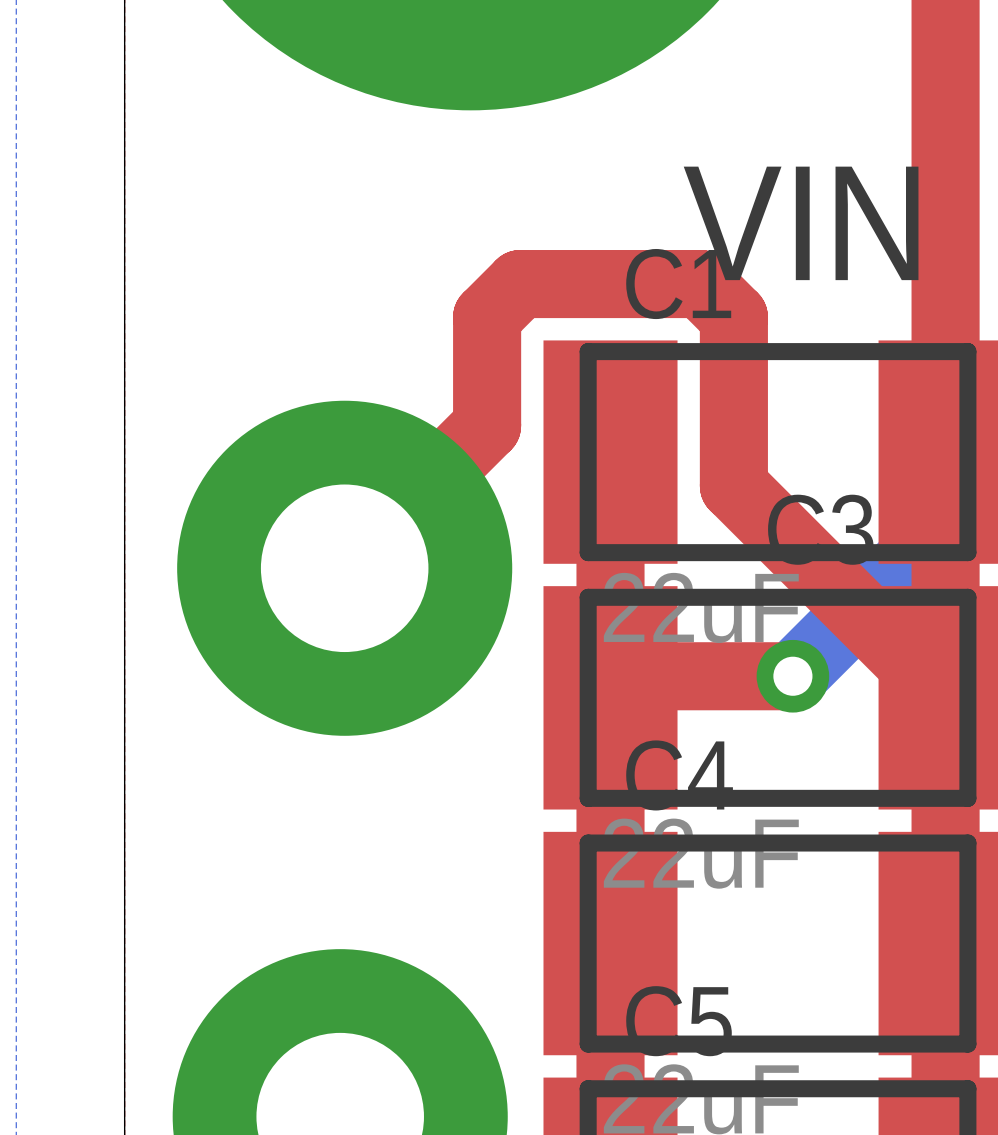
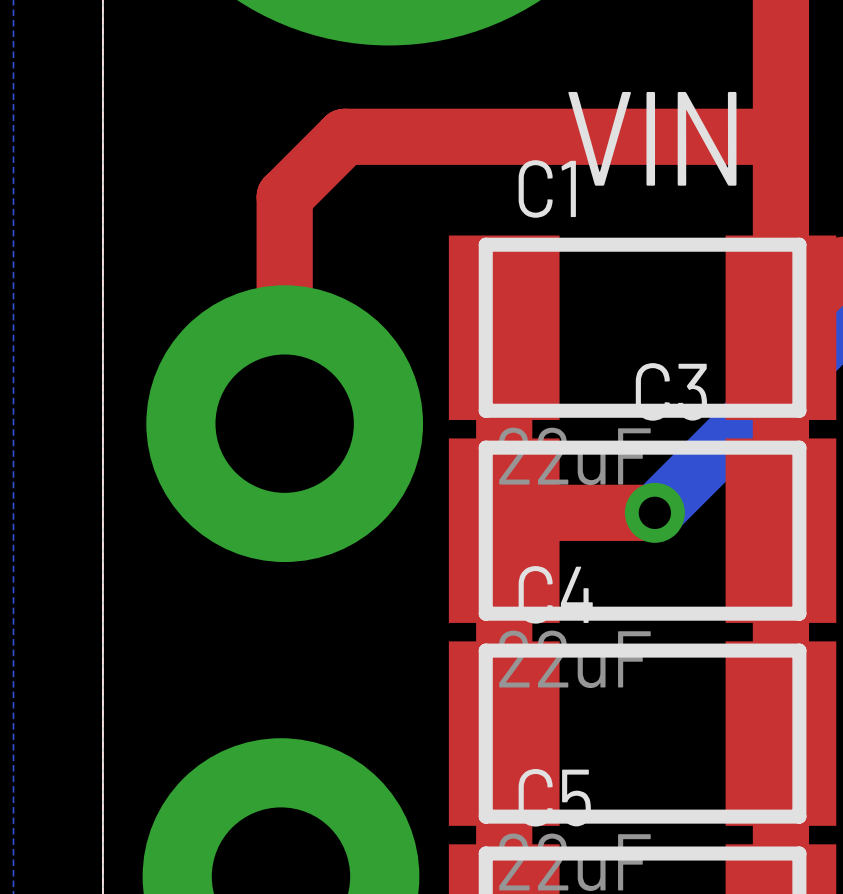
top track: (344, 568) (487, 425) (487, 317) (520, 284) (700, 284) (733, 317) (733, 486) (945, 697) -> (284, 423) (284, 196) (344, 136) (780, 136)

